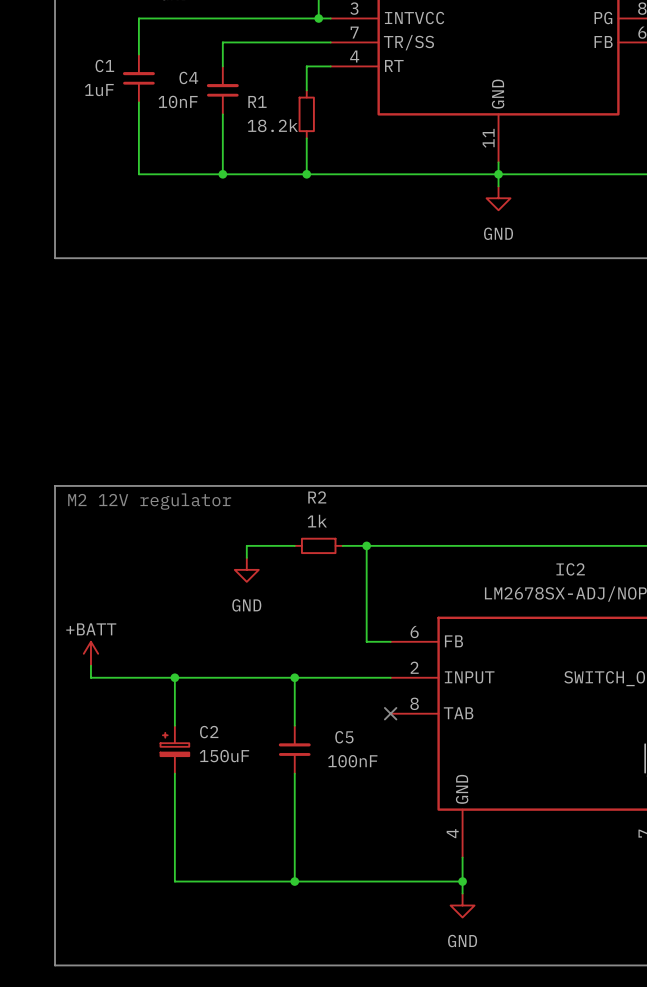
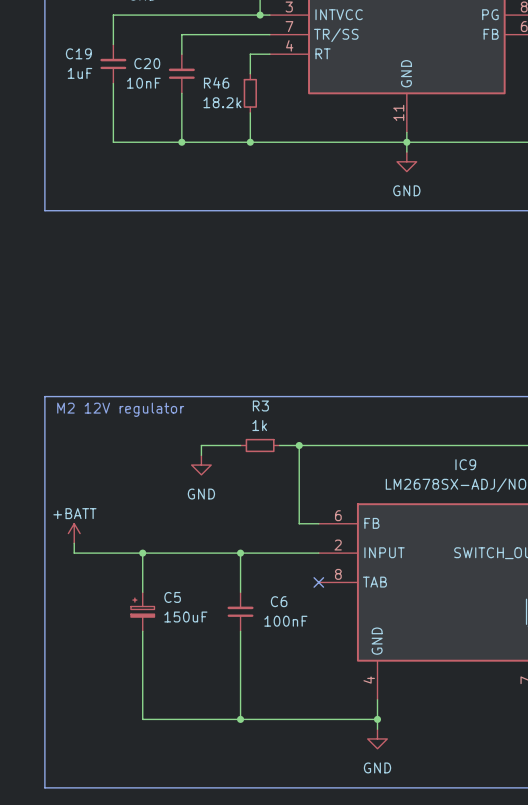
C1 name: C1 (104, 65) -> C19 (78, 53)
C4 name: C4 (188, 77) -> C20 (147, 63)
R1 name: R1 (257, 101) -> R46 (216, 82)
R2 name: R2 (317, 497) -> R3 (260, 406)
IC2 name: IC2 (570, 569) -> IC9 (465, 464)
C2 name: C2 (209, 732) -> C5 (172, 597)
C5 name: C5 (344, 737) -> C6 (279, 601)

